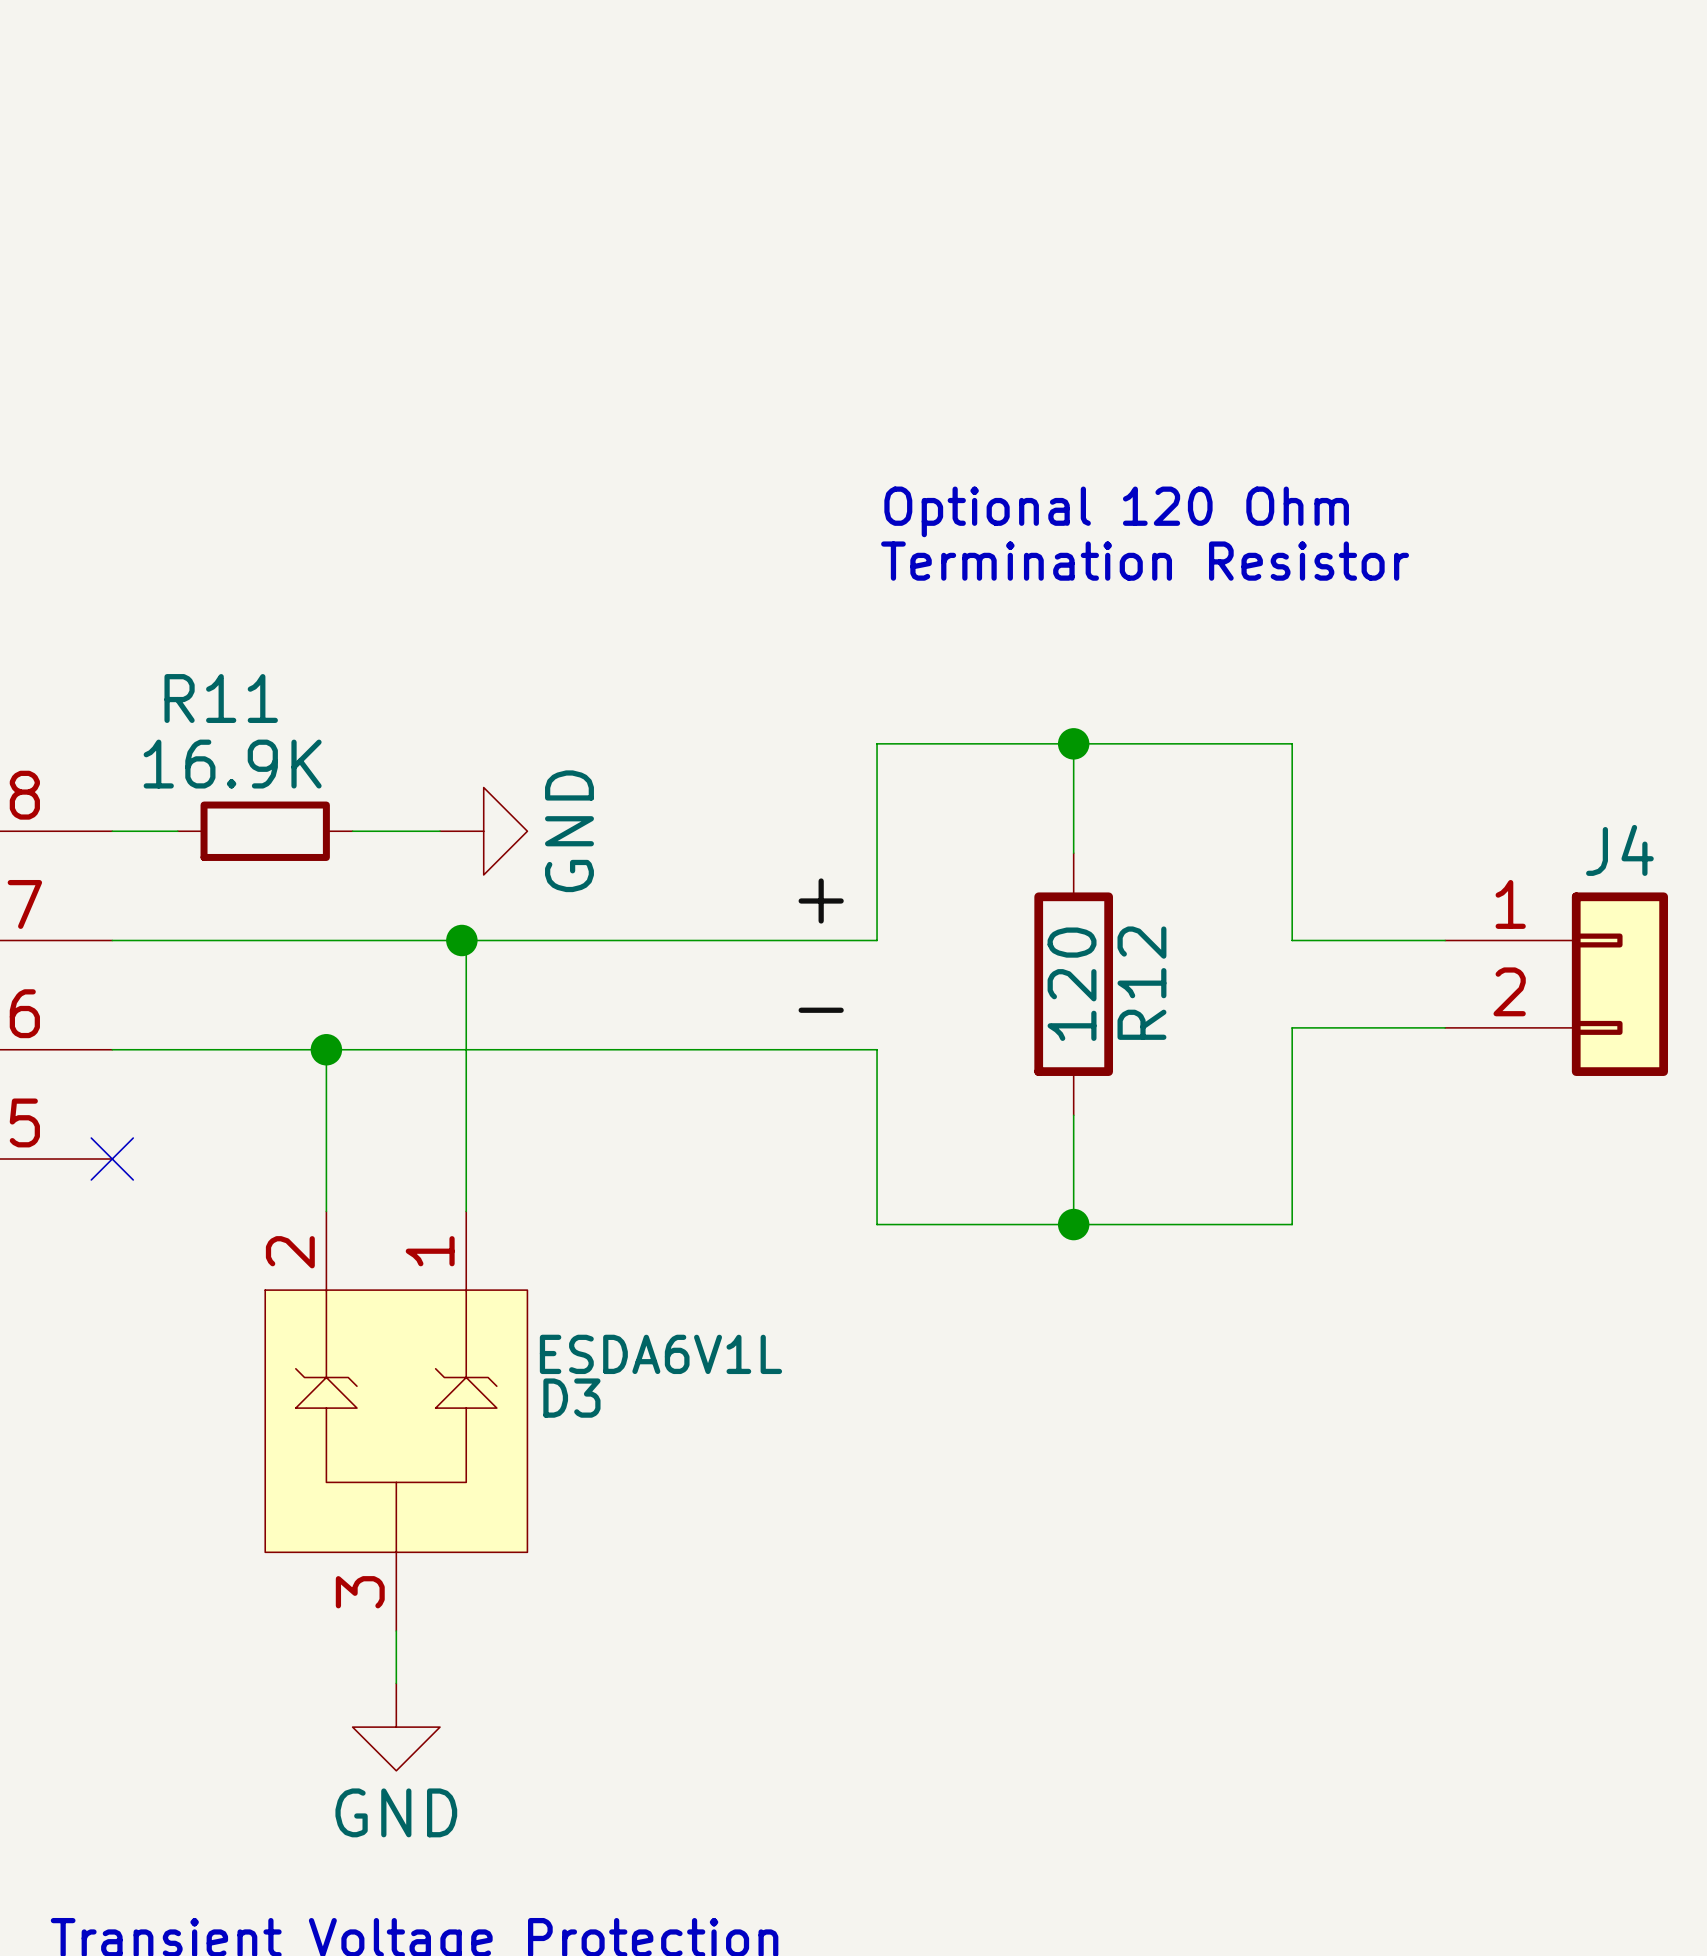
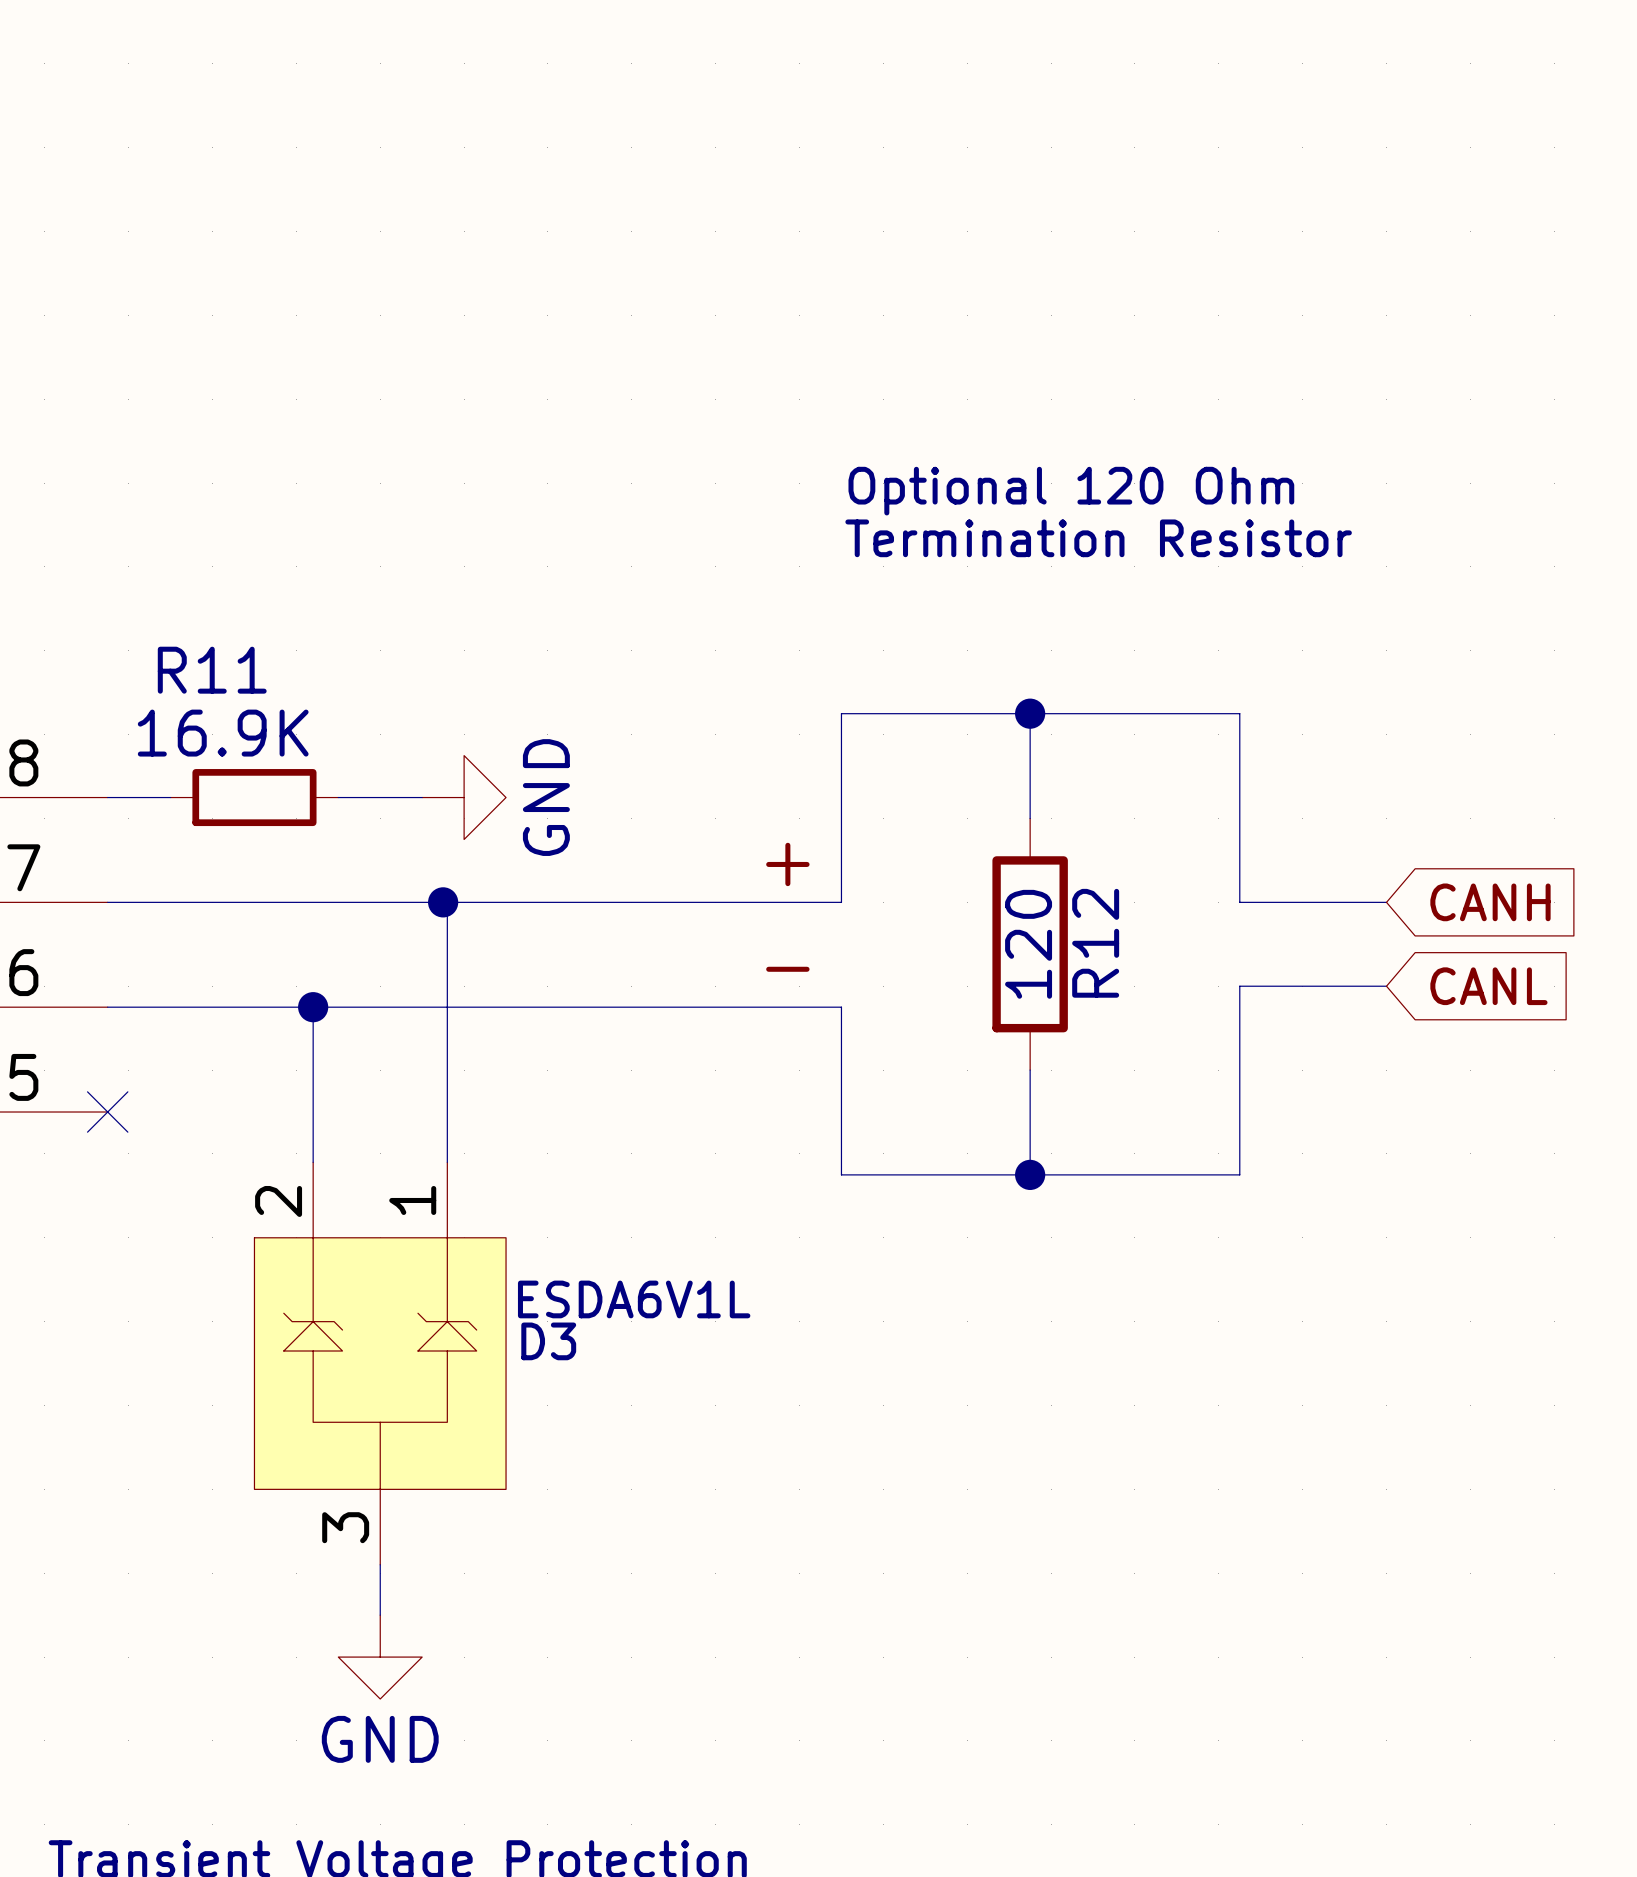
global label: none -> CANH (1490, 902)
J4: (1556, 984) -> none
global label: none -> CANL (1488, 986)

